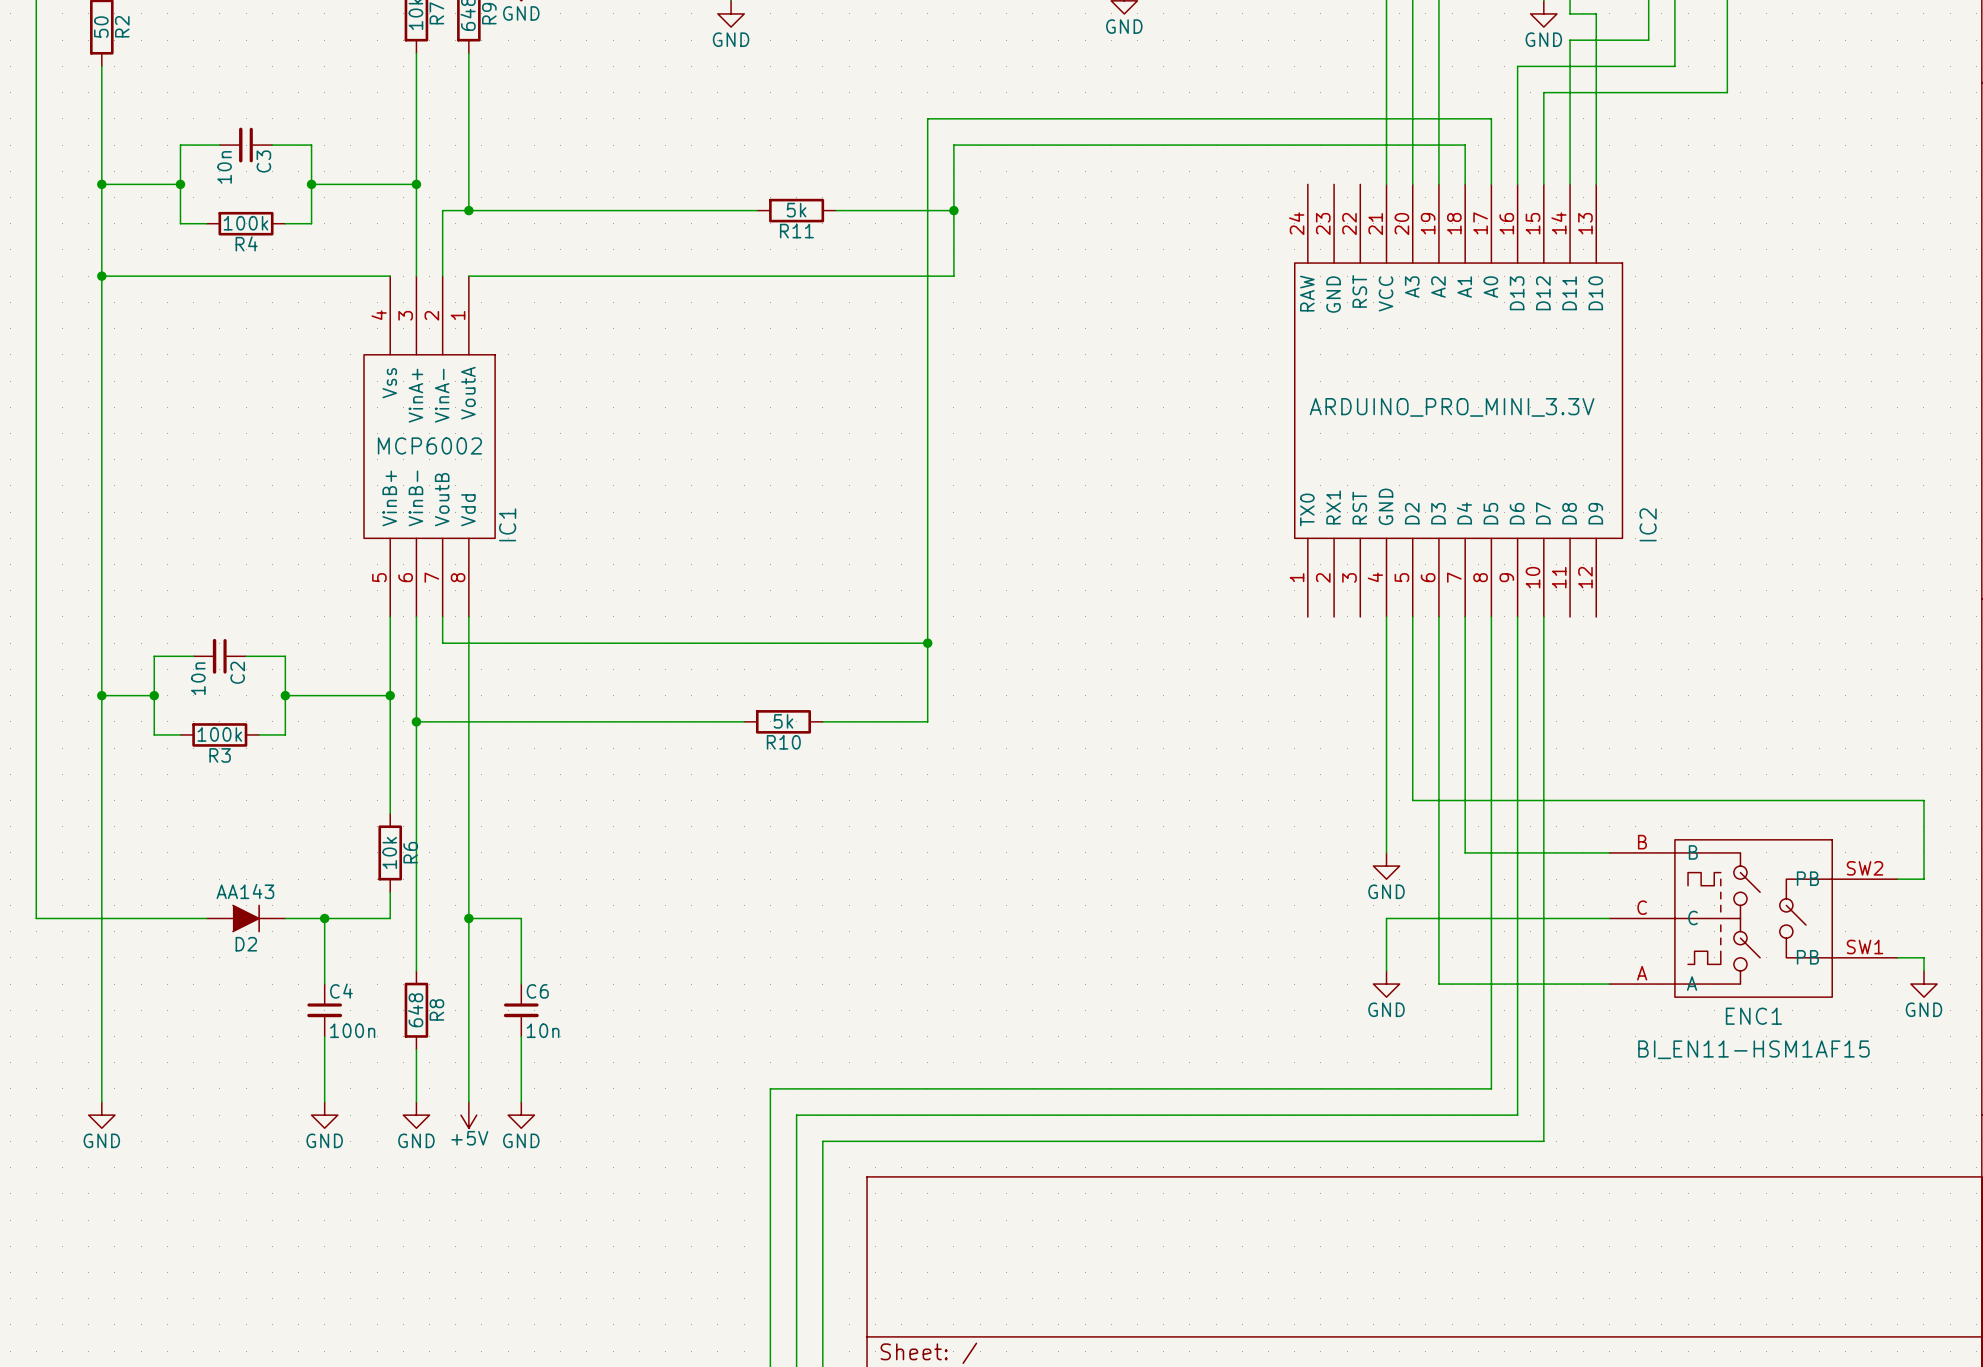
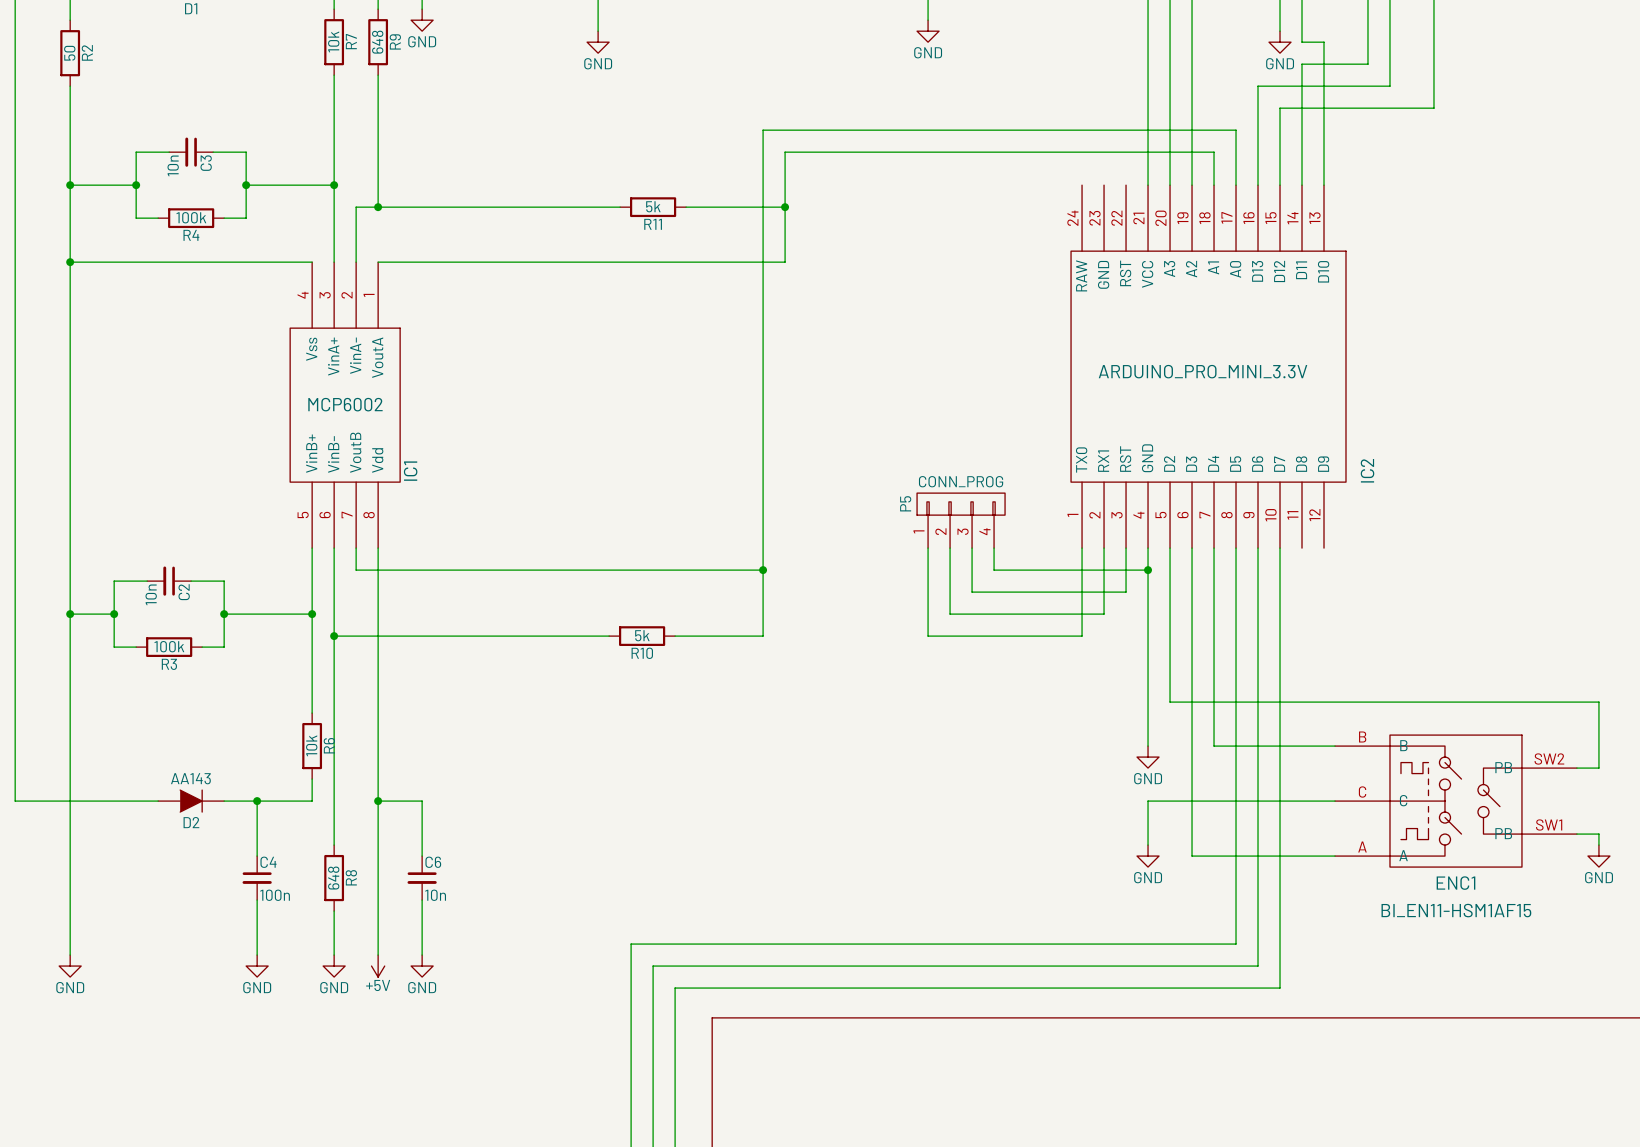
P5: none -> CONN_PROG (961, 520)
wire: none -> (928, 548) (928, 636) (1082, 636) (1082, 548)
wire: none -> (950, 548) (950, 614) (1104, 614) (1104, 548)
wire: none -> (972, 548) (972, 592) (1126, 592) (1126, 548)
wire: none -> (994, 548) (994, 570) (1148, 570)
junction: none -> (1148, 570)

